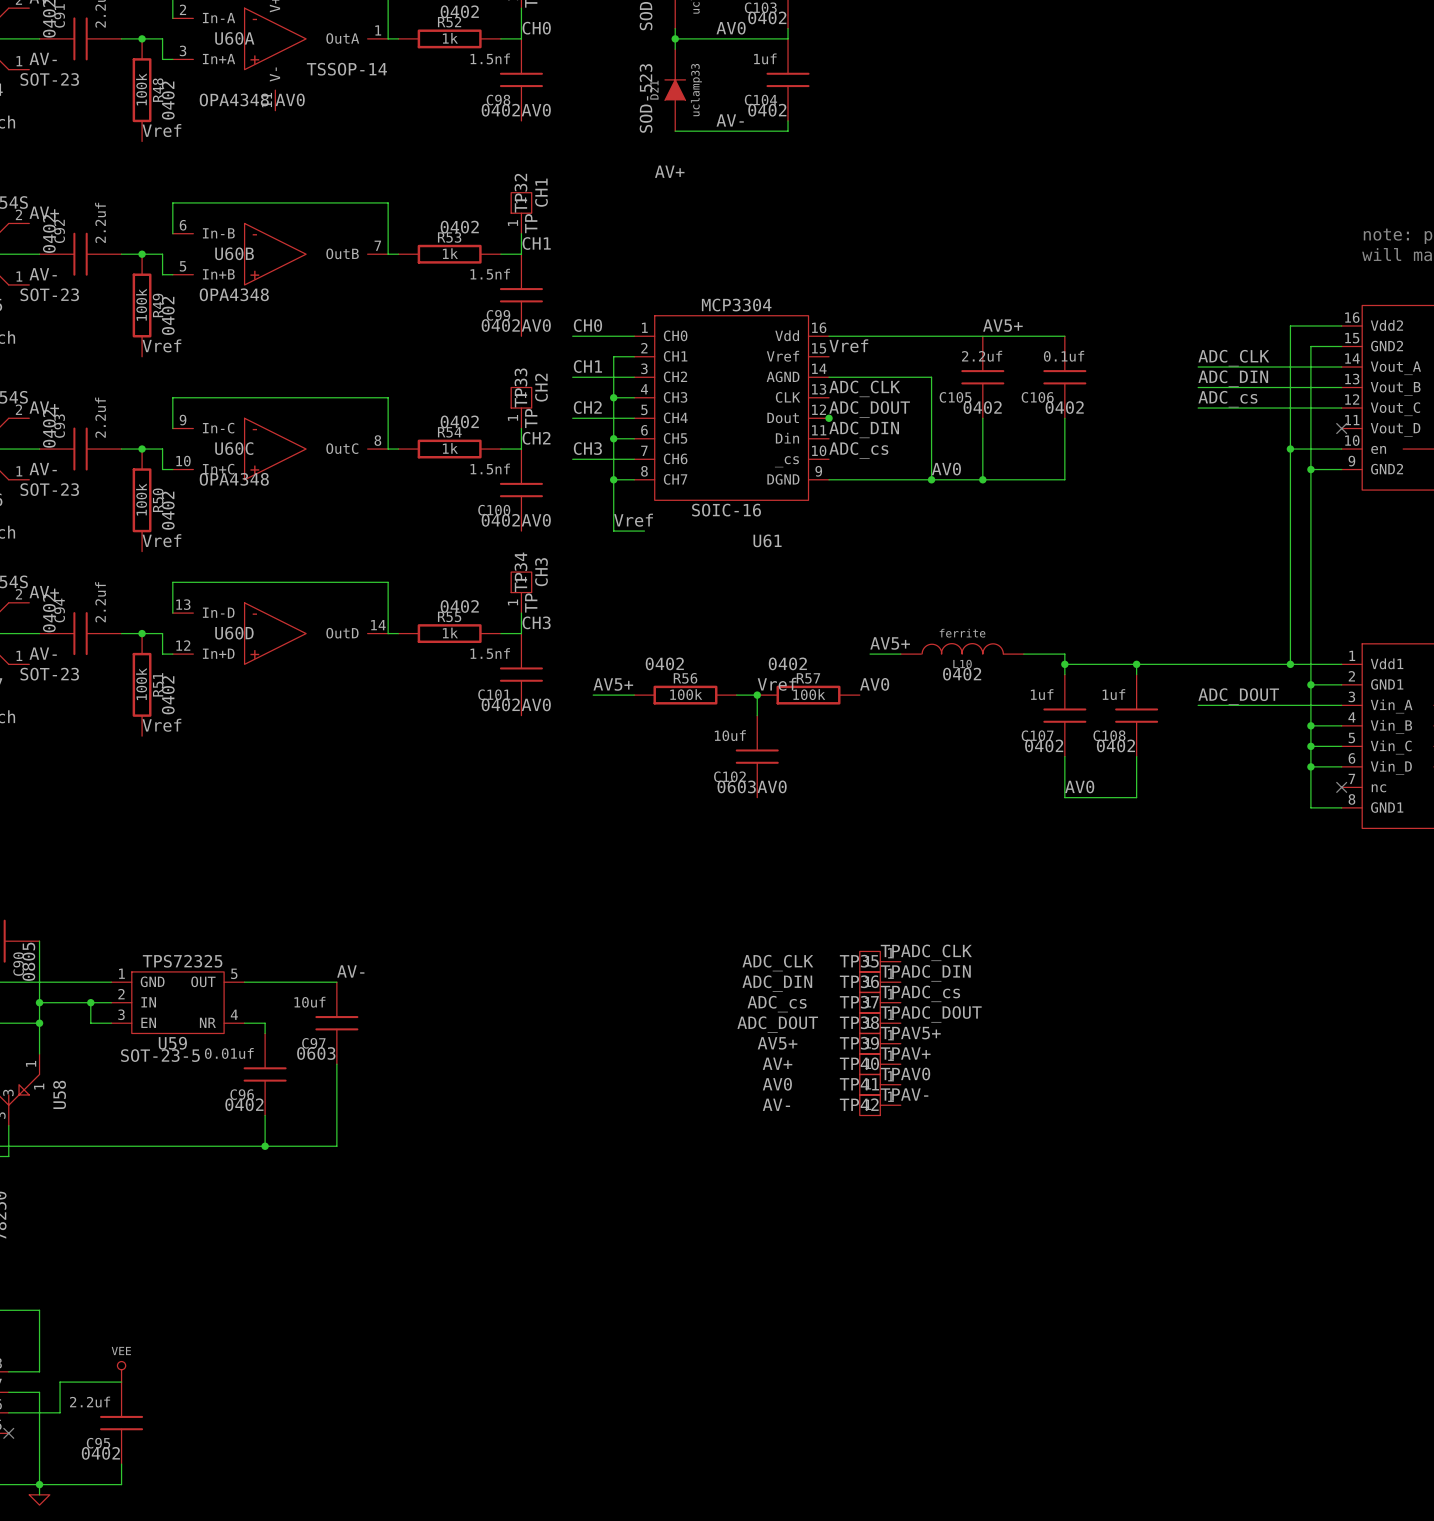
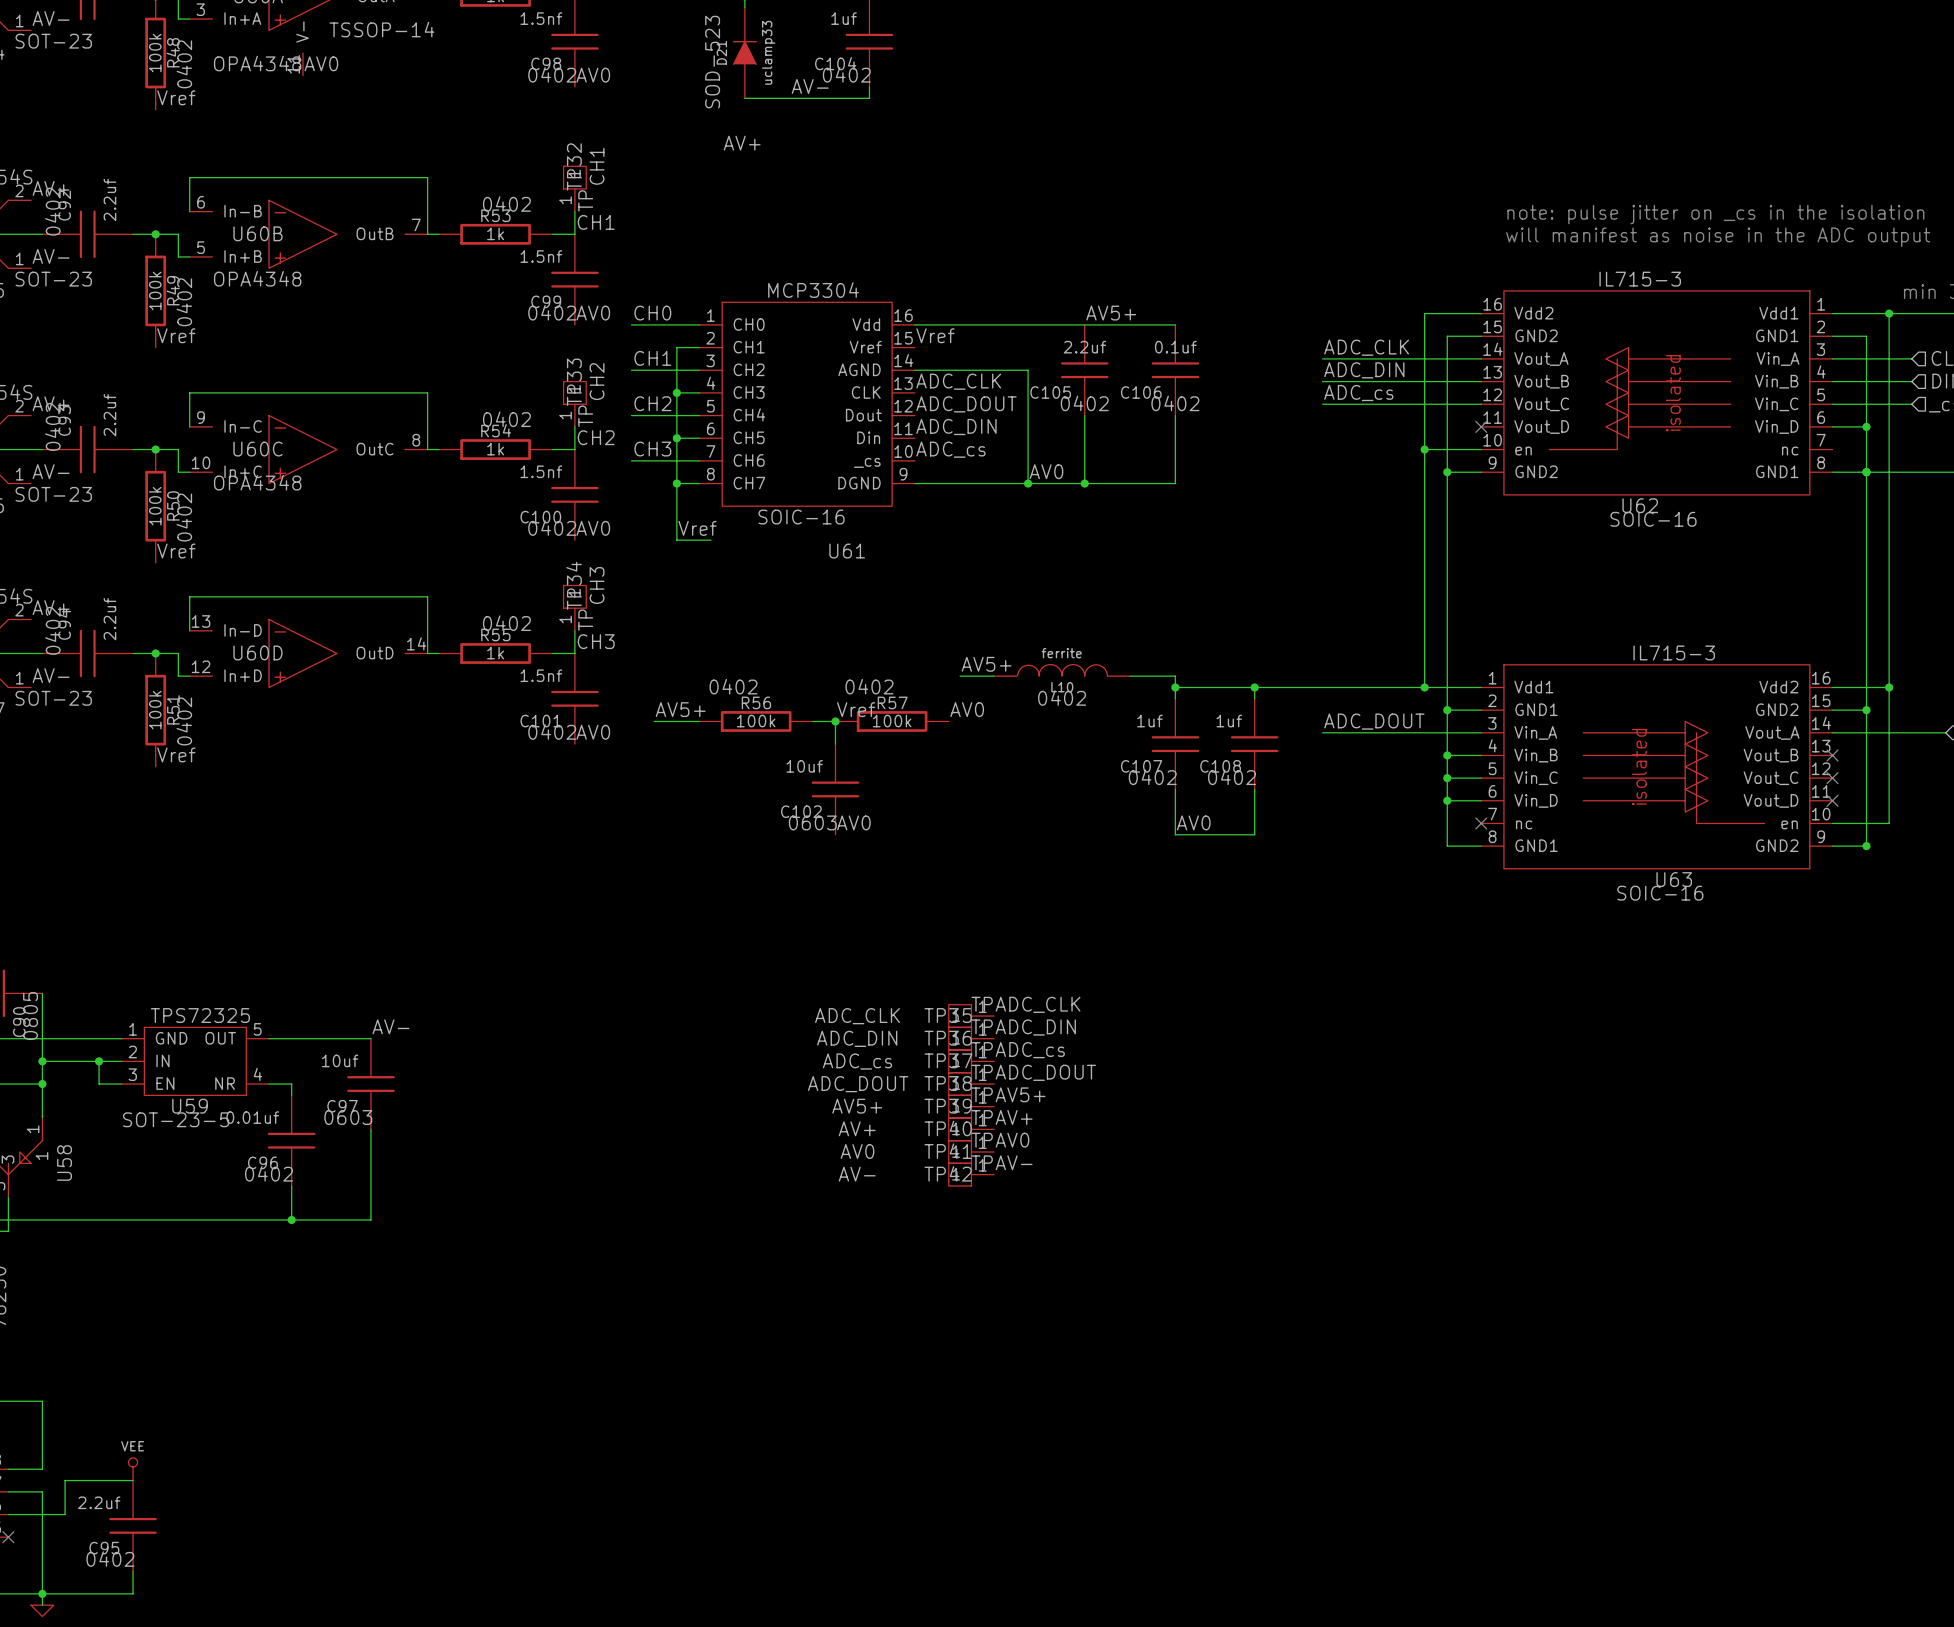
junction: (829, 418) -> none

